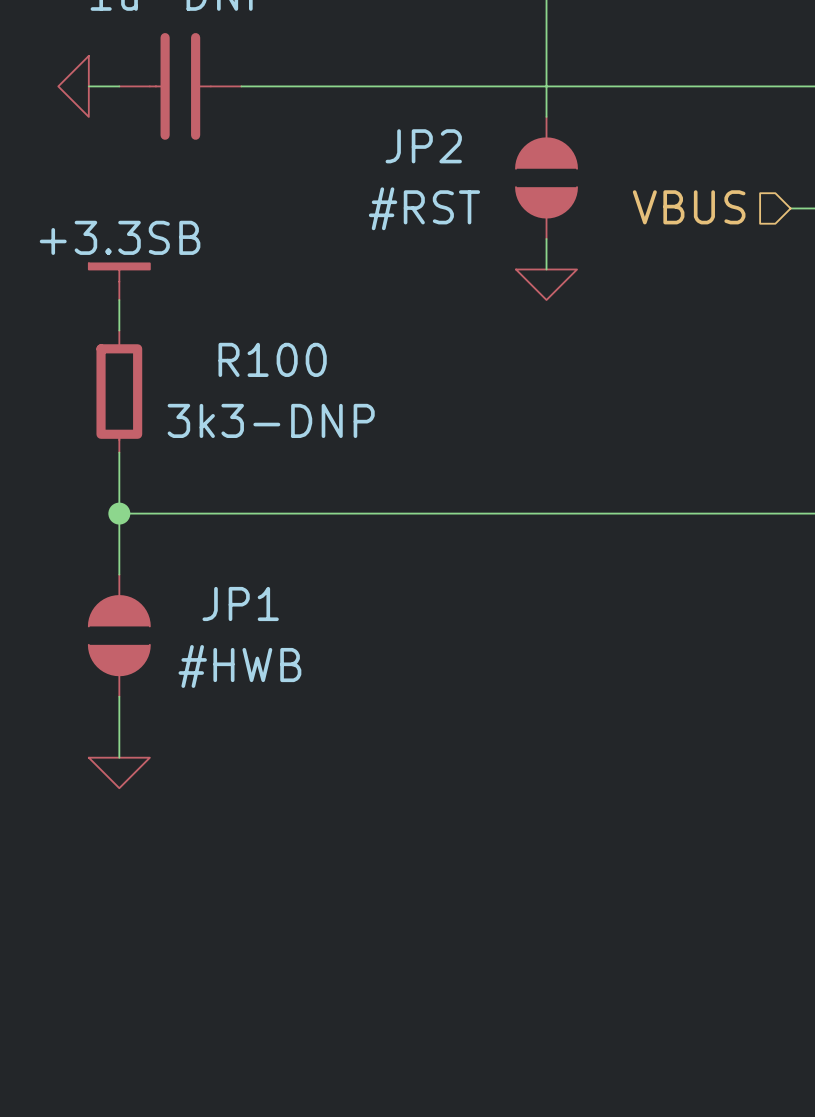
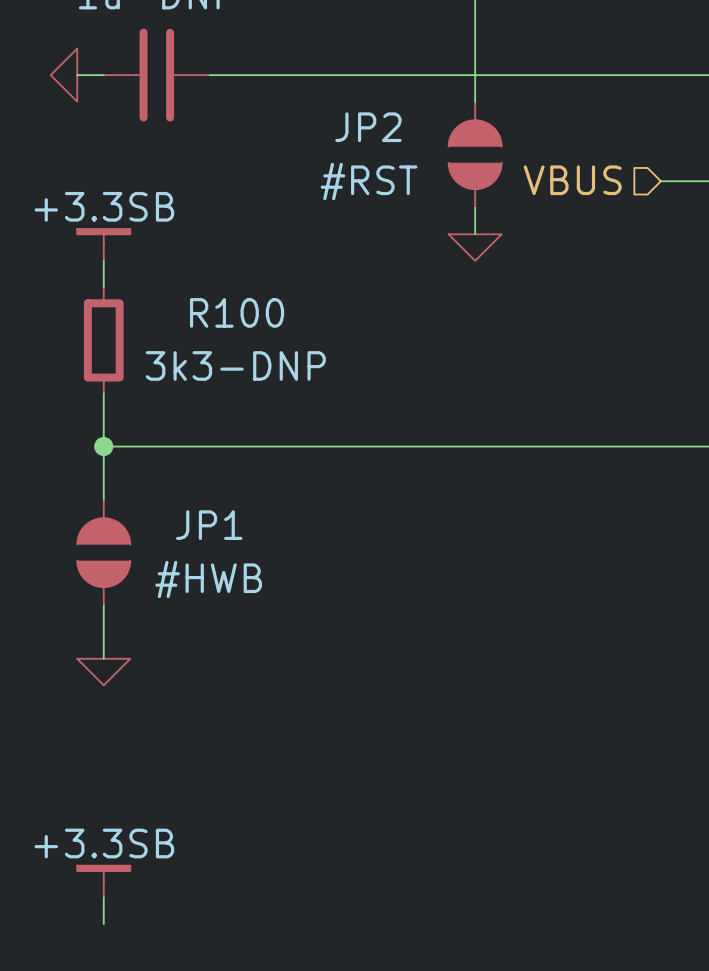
hierarchical label position: VBUS (689, 207) -> VBUS (572, 180)
wire: none -> (660, 181) (687, 181)
power symbol: none -> +3.3SB (103, 881)
wire: none -> (103, 897) (103, 924)

